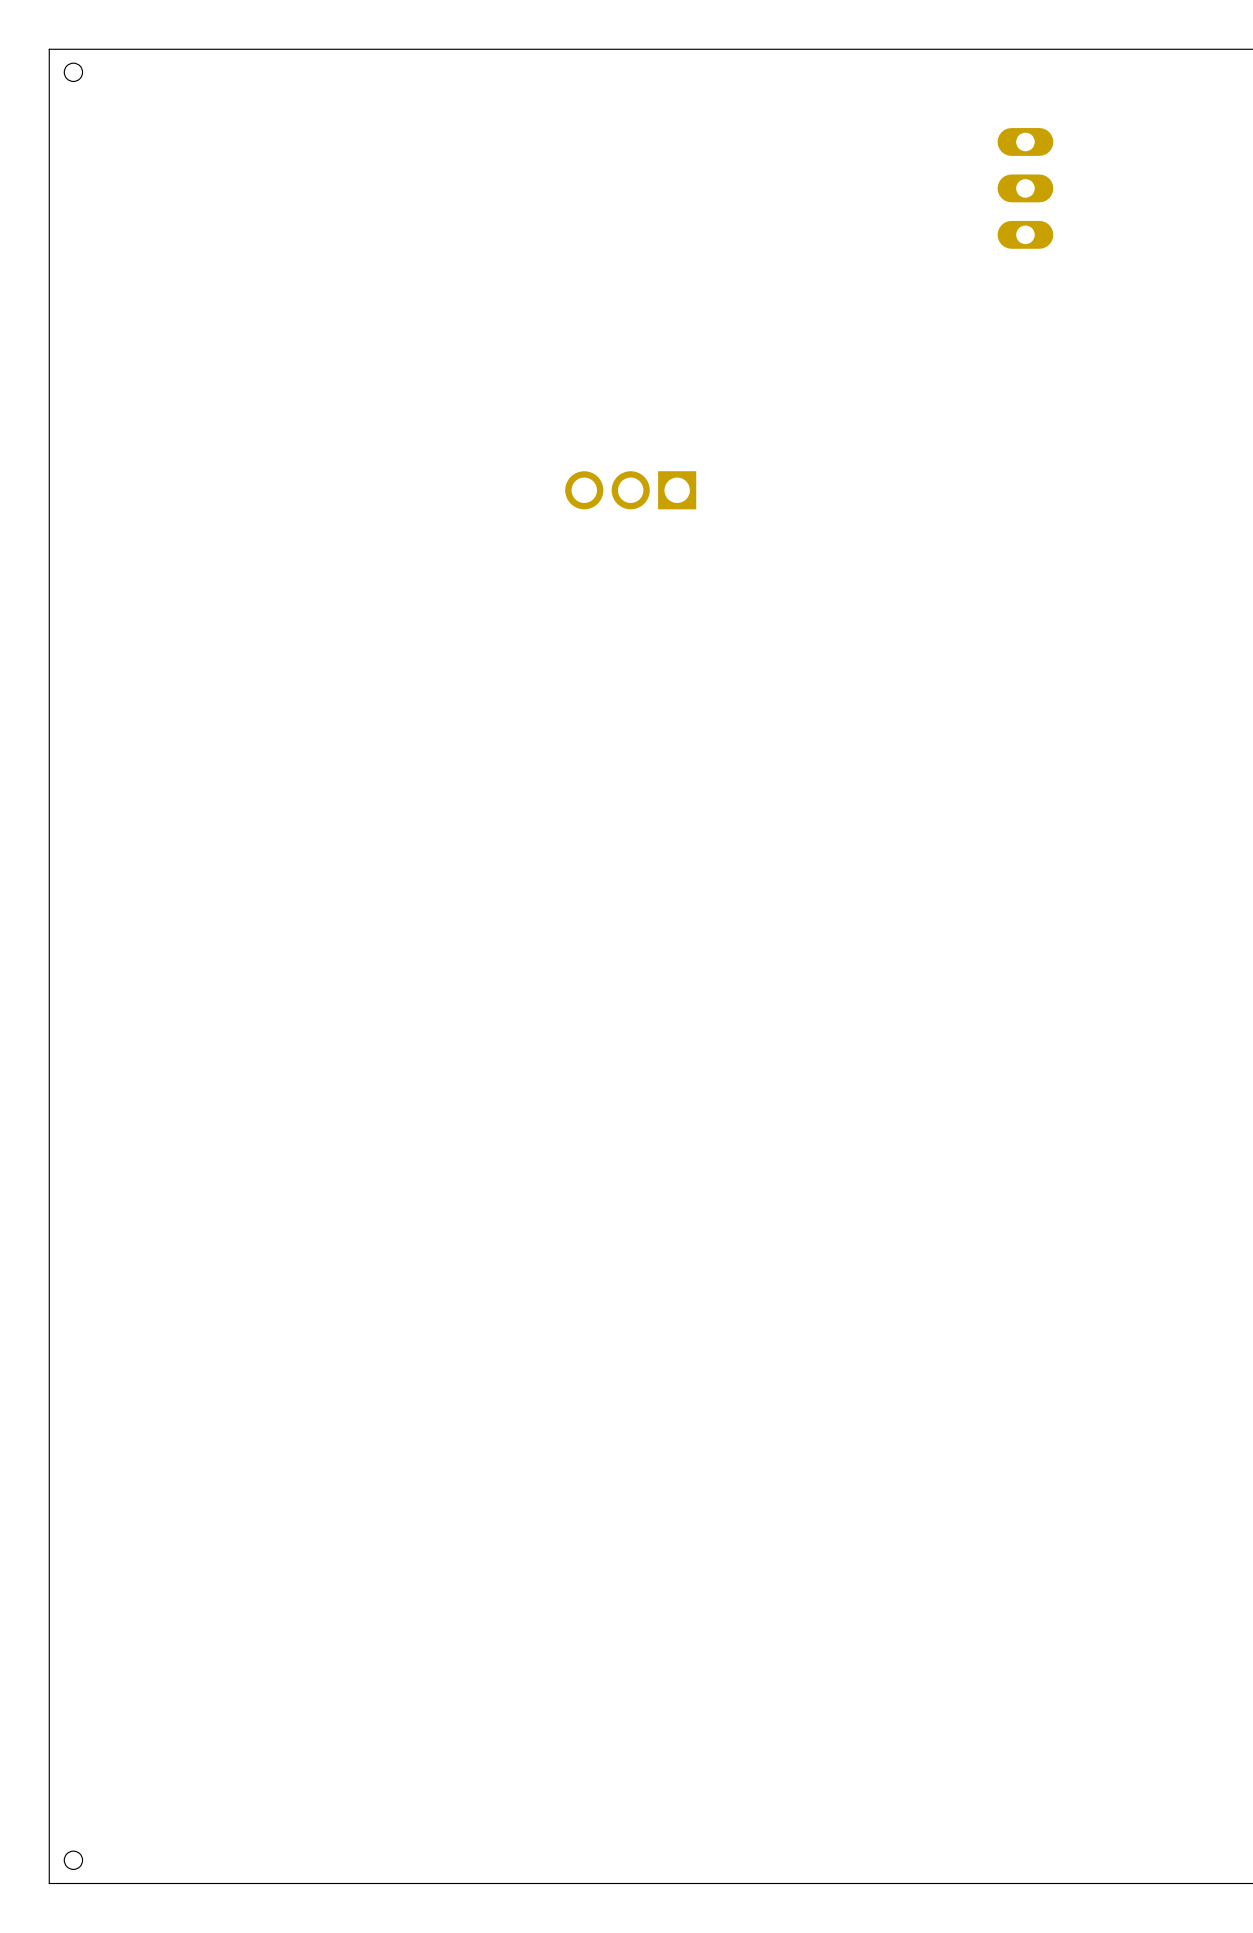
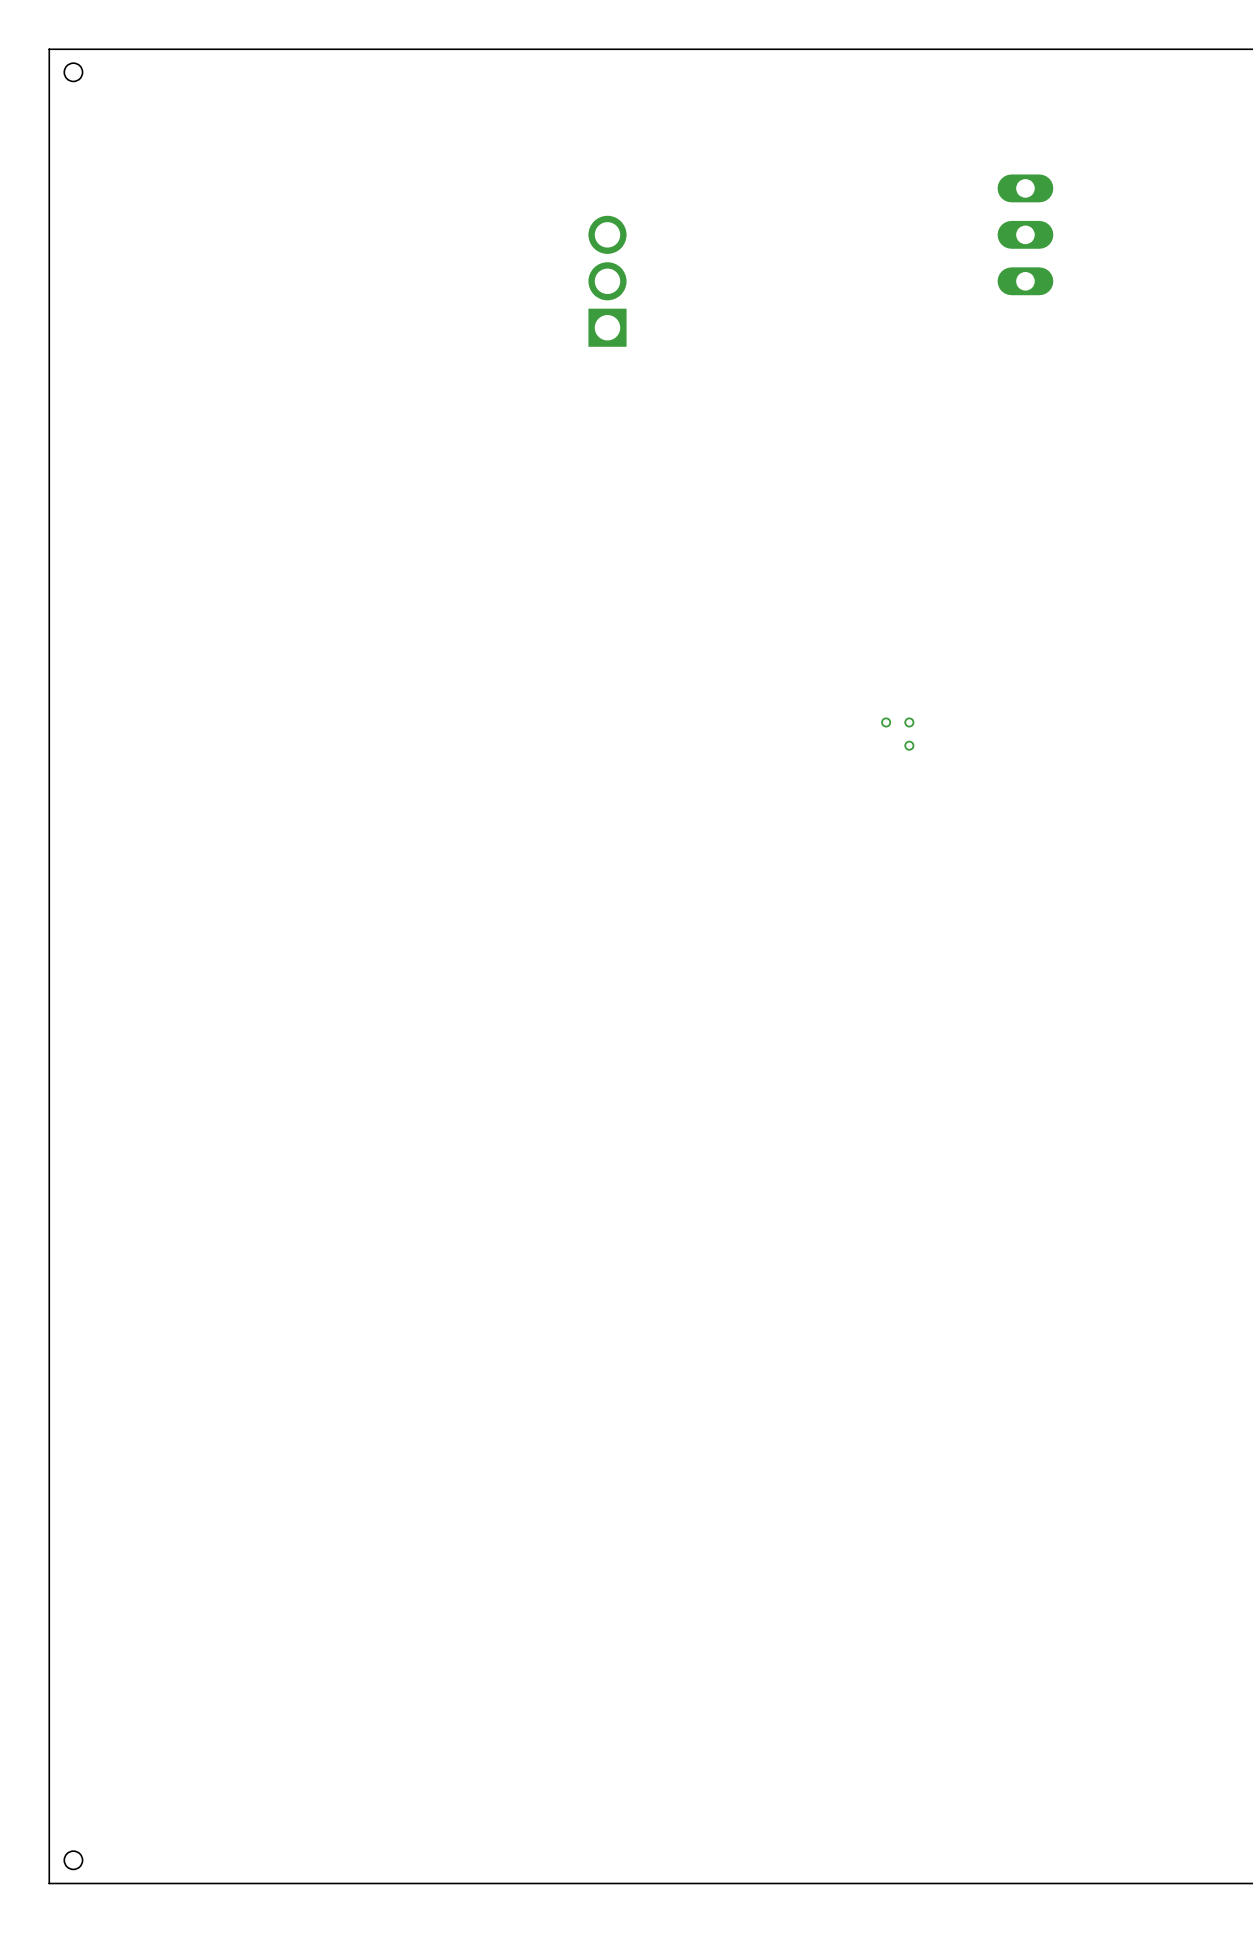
part position: (1025, 188) -> (1025, 234)
part rotation: 0° (630, 490) -> 90° clockwise (607, 281)
part position: (630, 490) -> (607, 281)
via: none -> (886, 722)
via: none -> (909, 722)
via: none -> (909, 745)

